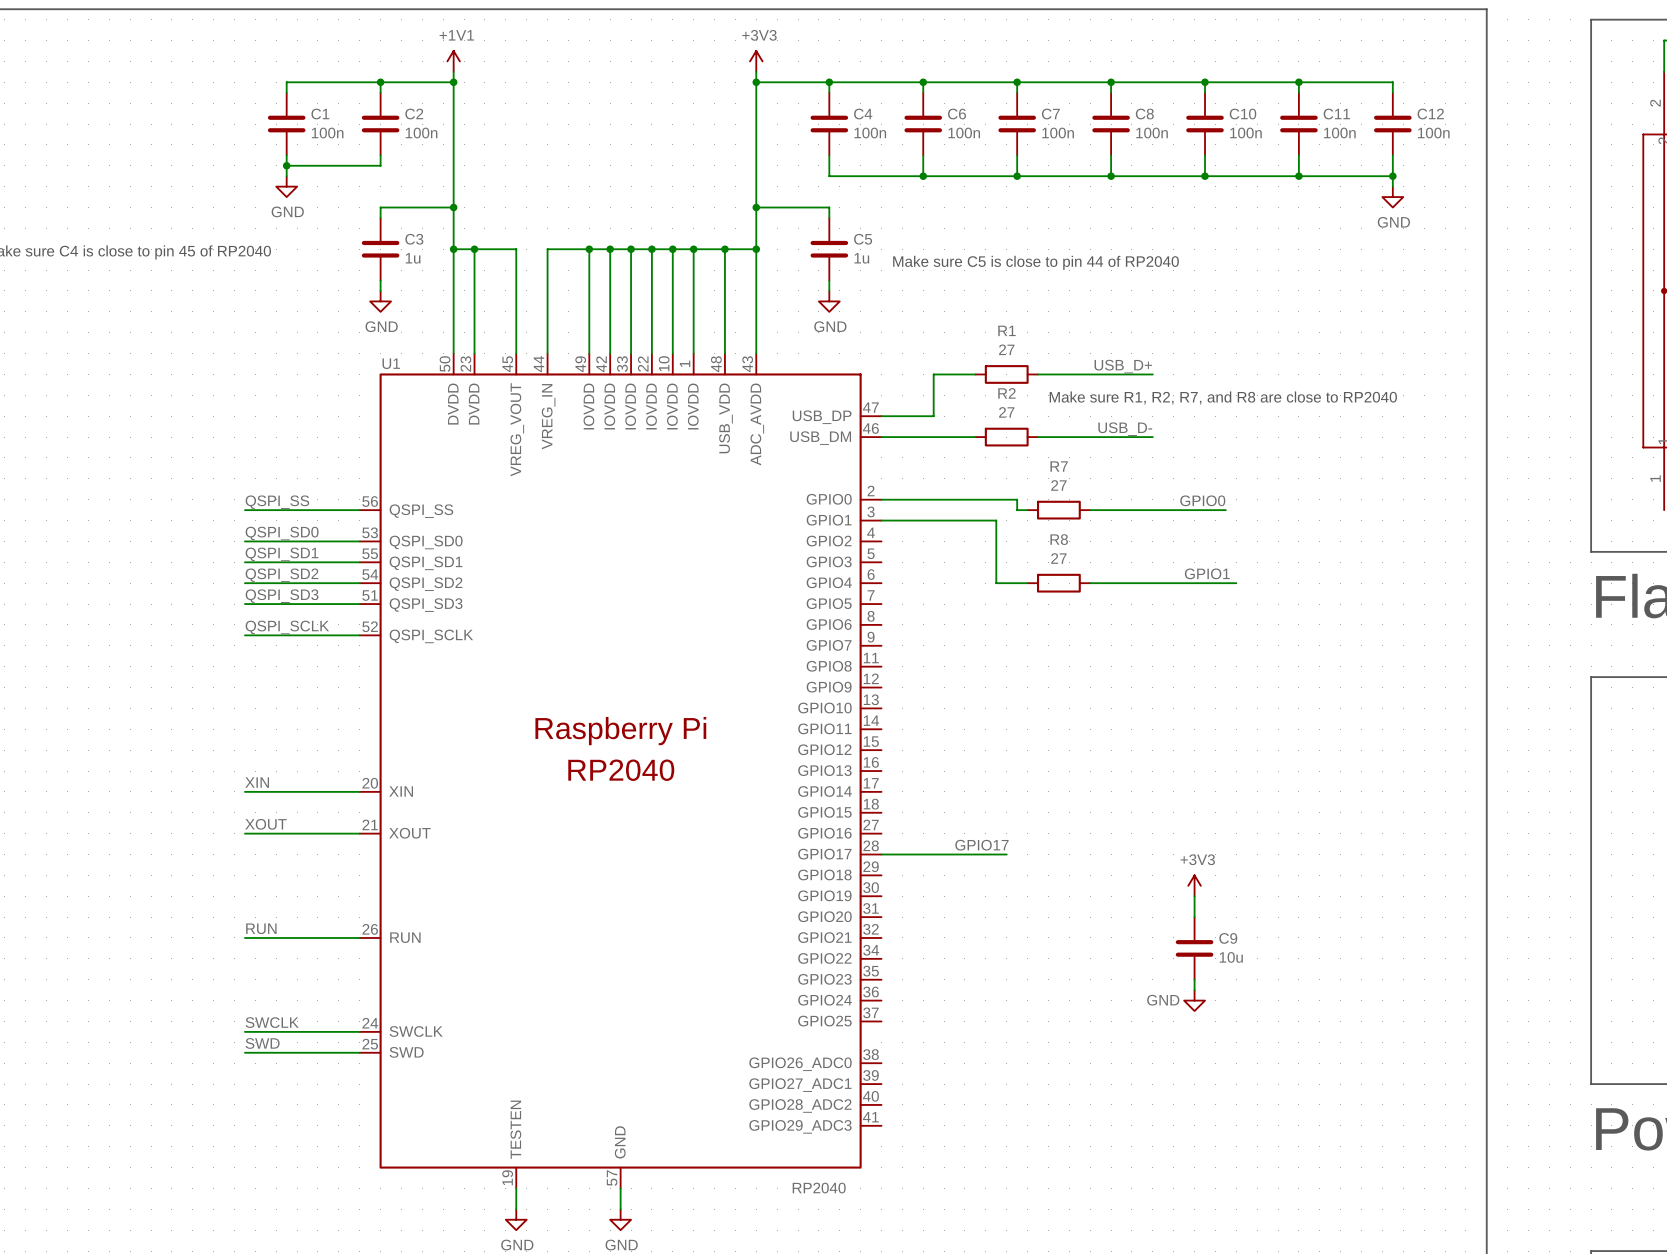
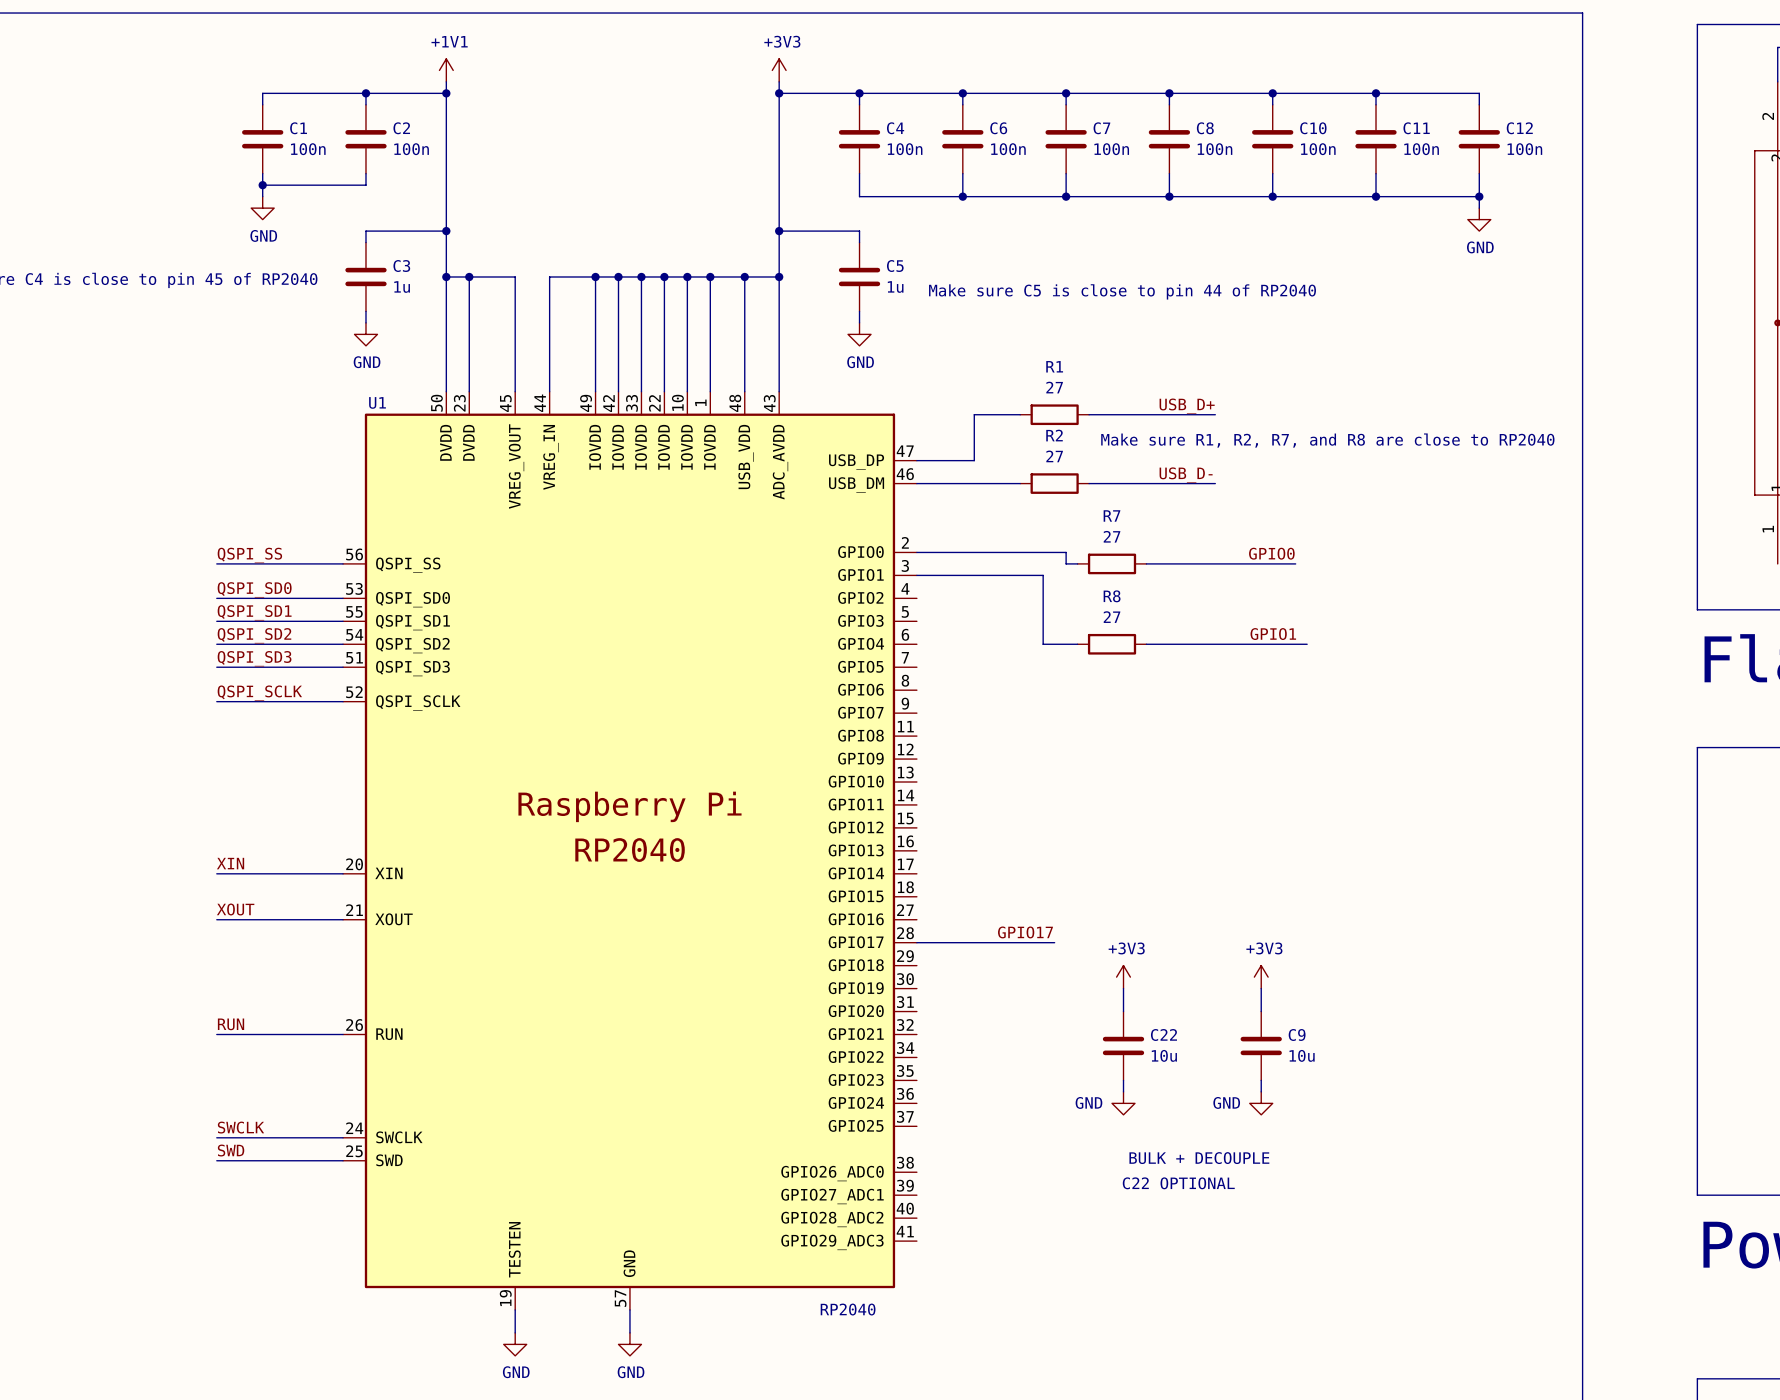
power symbol: none -> +3V3 (1123, 977)
wire: none -> (1123, 988) (1123, 1011)
C22: none -> 10u (1123, 1045)
wire: none -> (1123, 1080) (1123, 1091)
power symbol: none -> GND (1123, 1103)
text: none -> BULK + DECOUPLE (1199, 1158)
text: none -> C22 OPTIONAL (1178, 1183)

